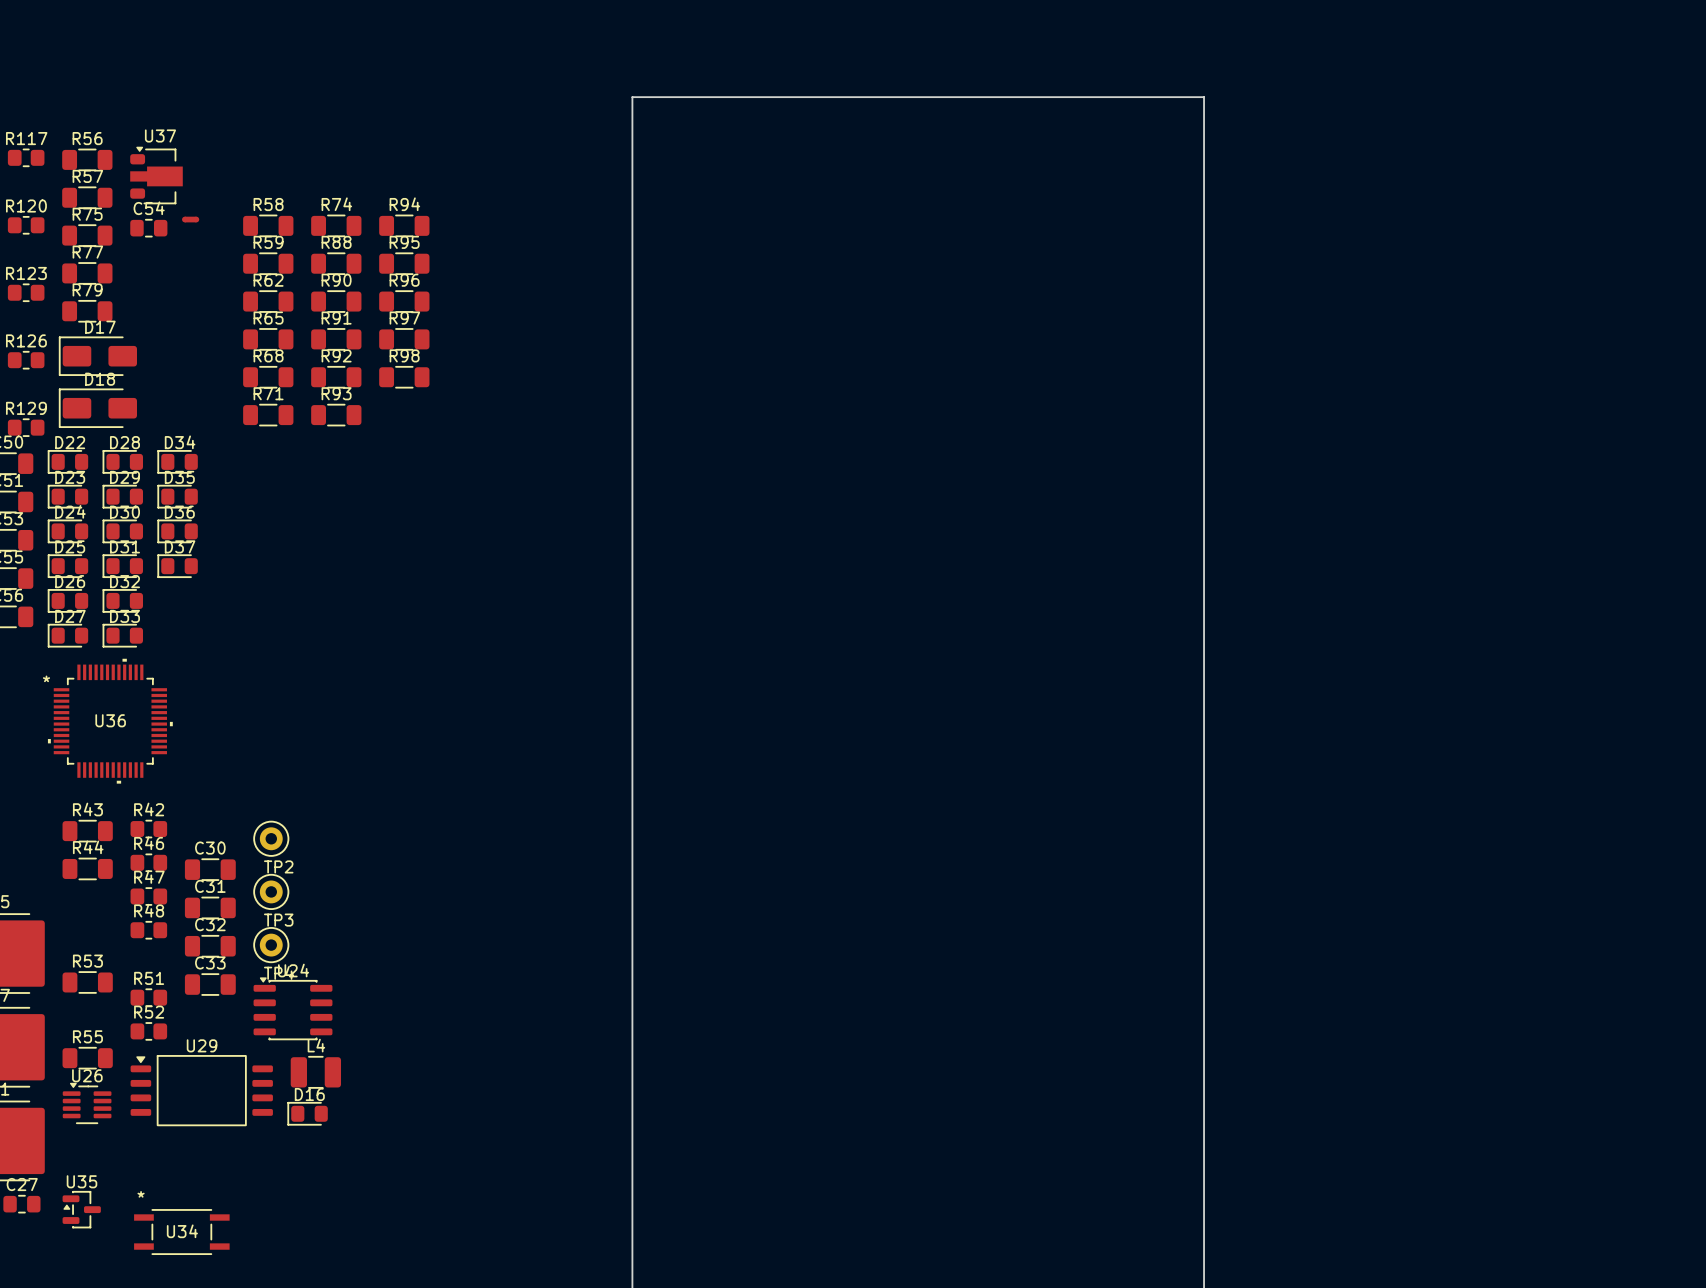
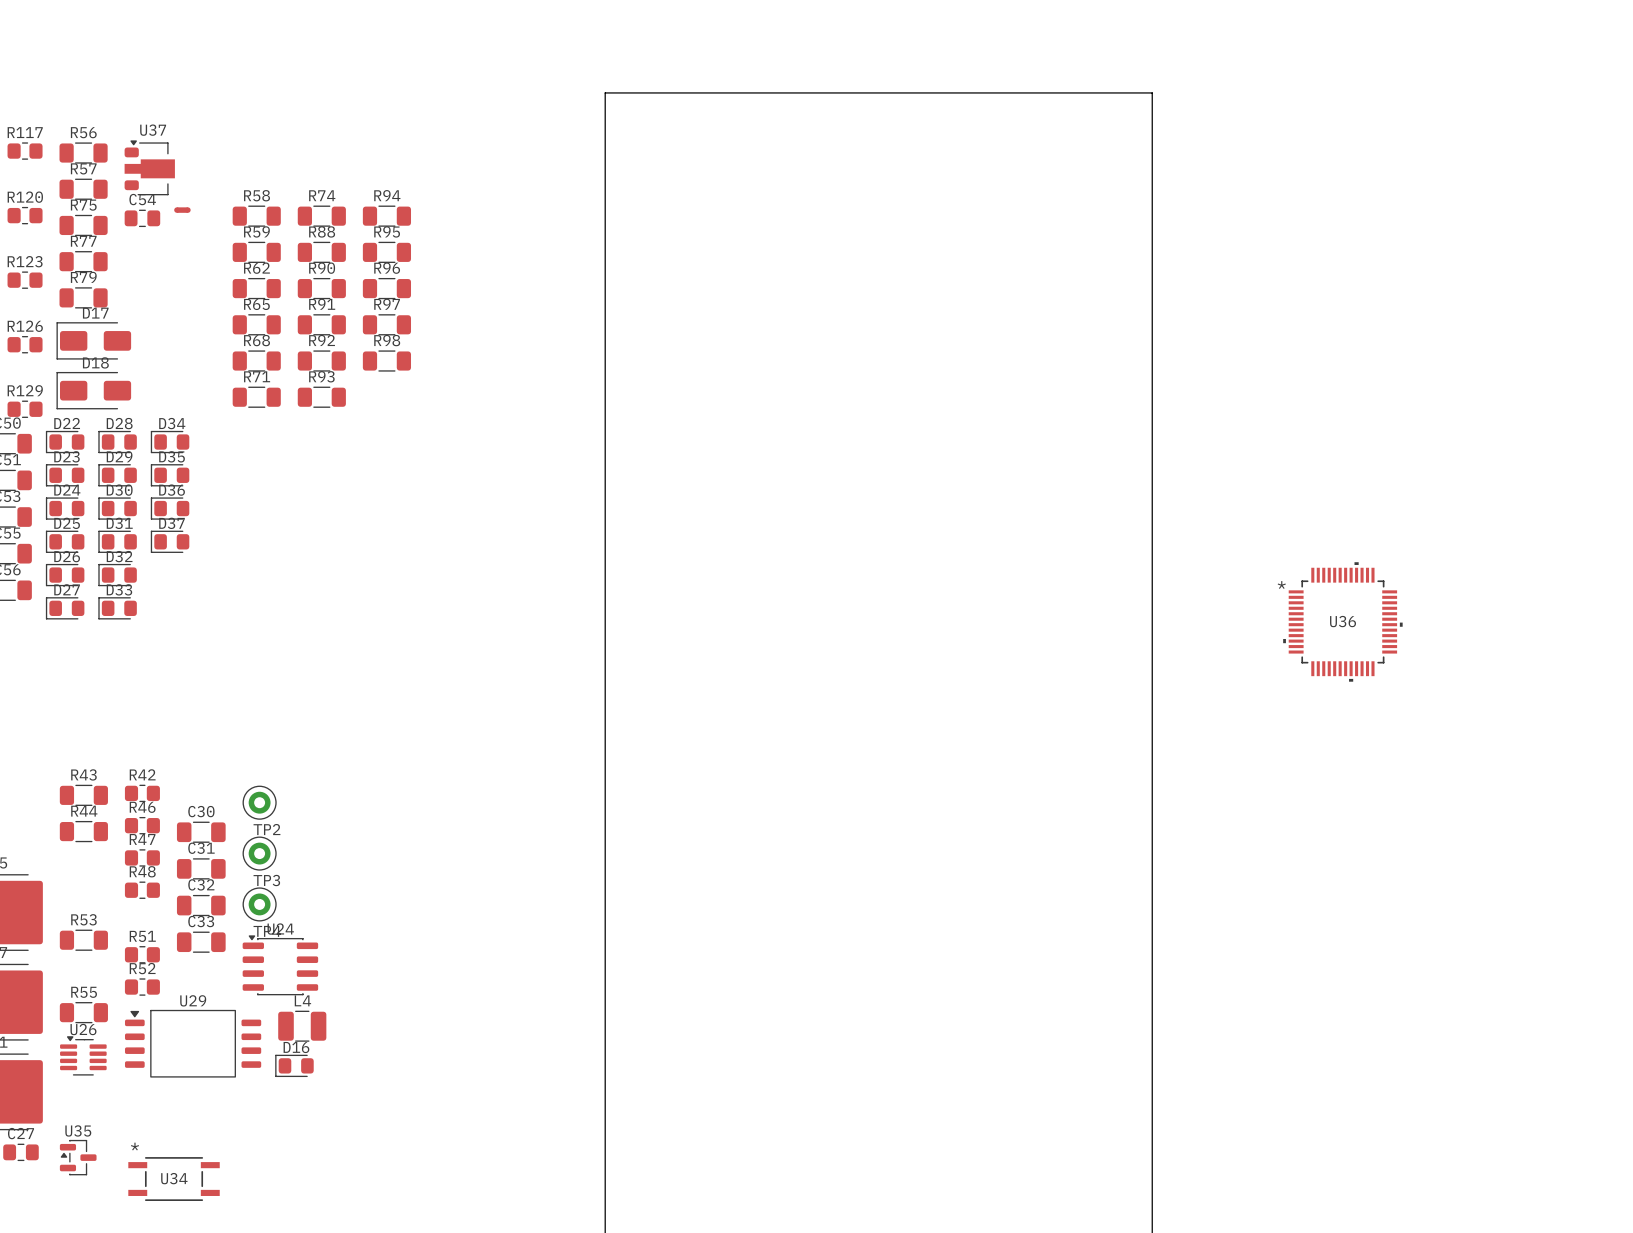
U36 position: (110, 721) -> (1342, 621)

